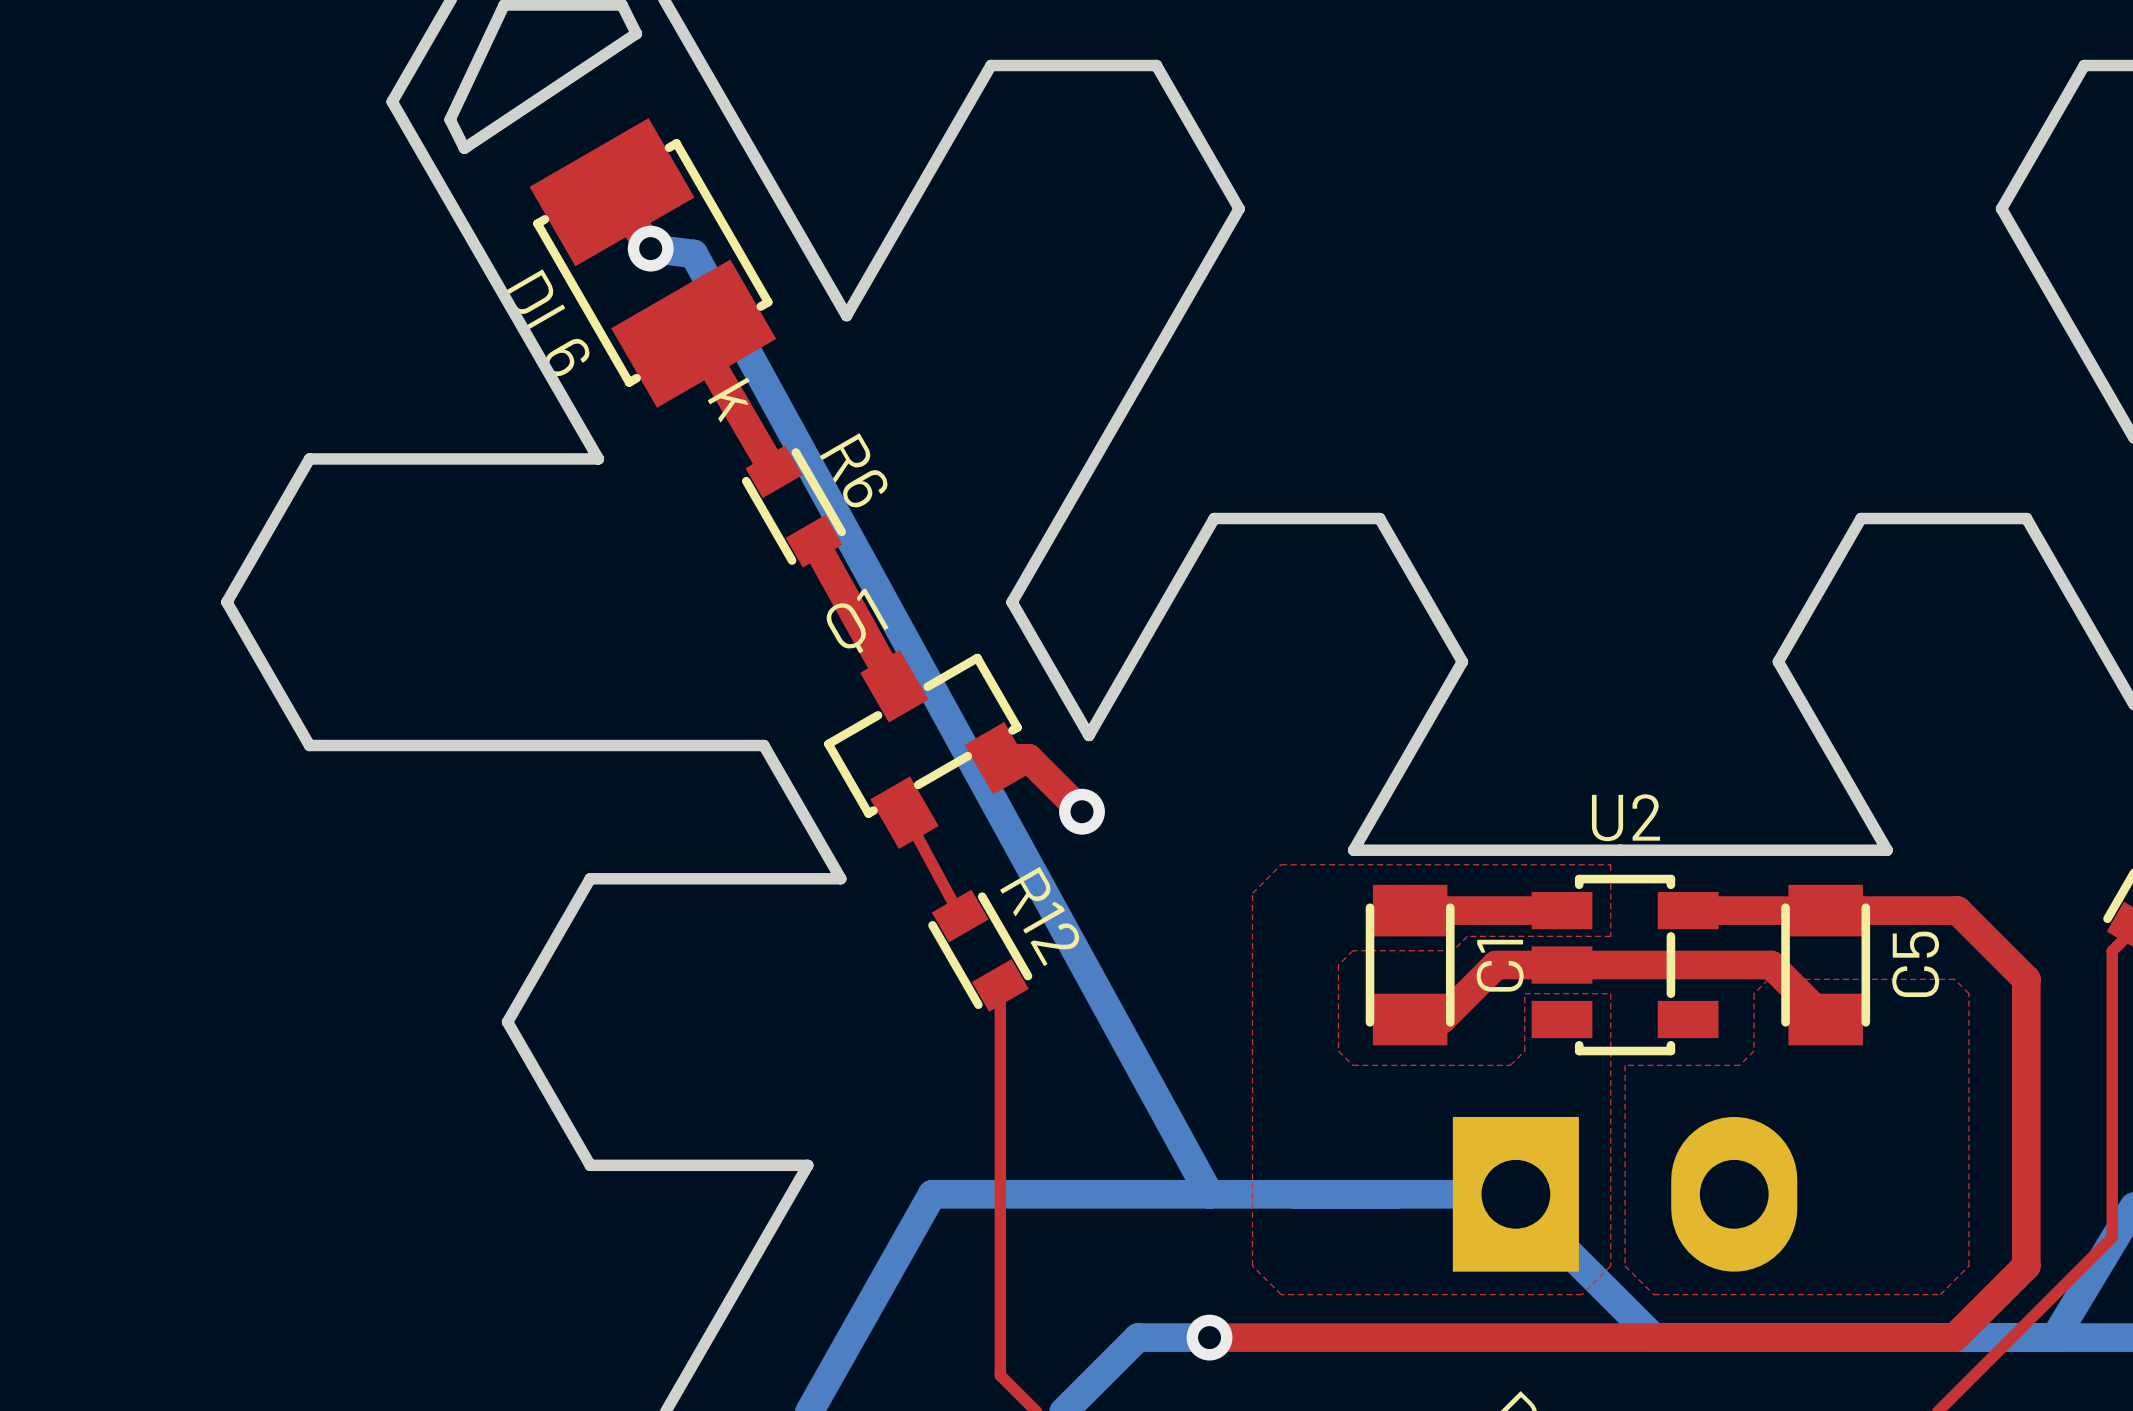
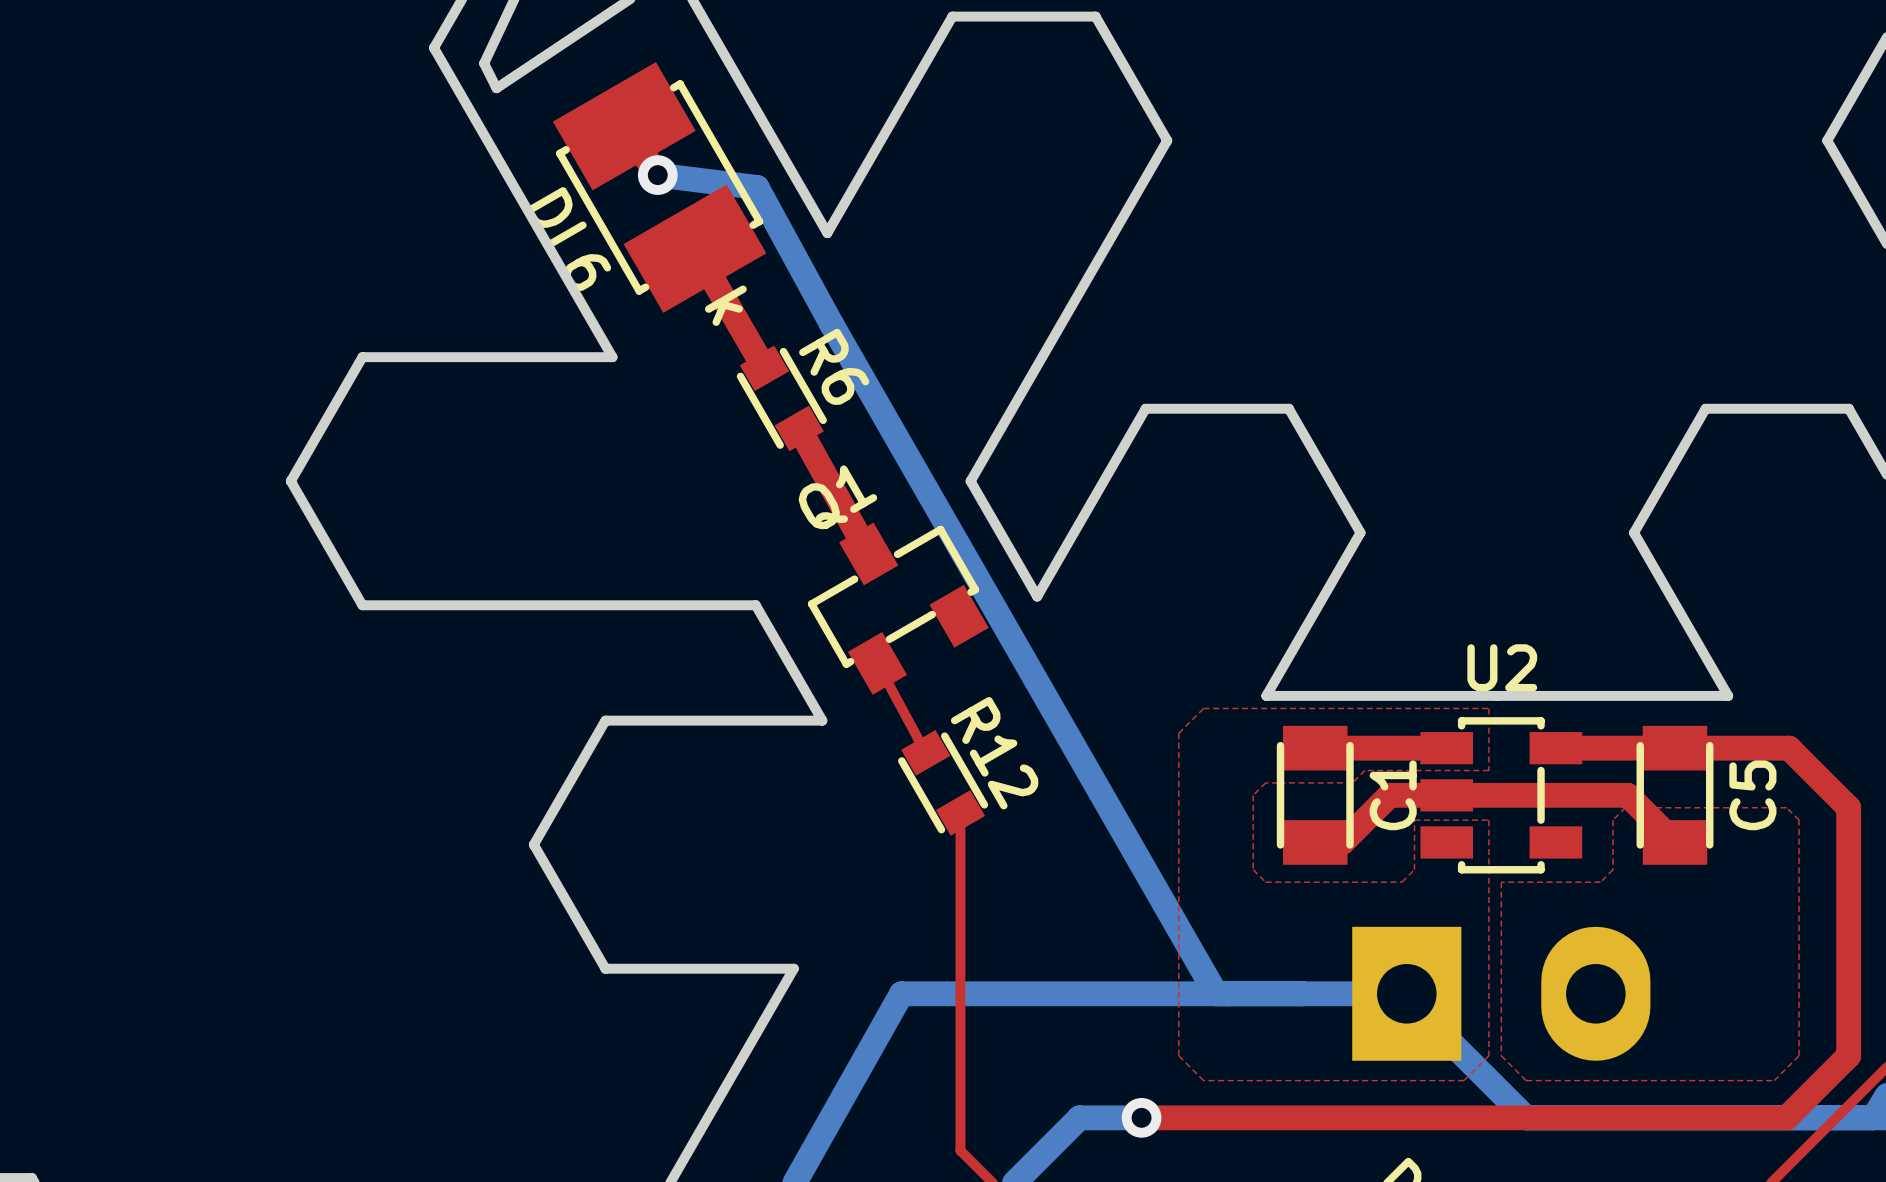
bottom track: (693, 253) (1209, 1194) -> (695, 179) (757, 187) (831, 323) (1216, 993)
top track: (998, 758) (1028, 758) (1082, 811) -> none
via: (1082, 811) -> none

